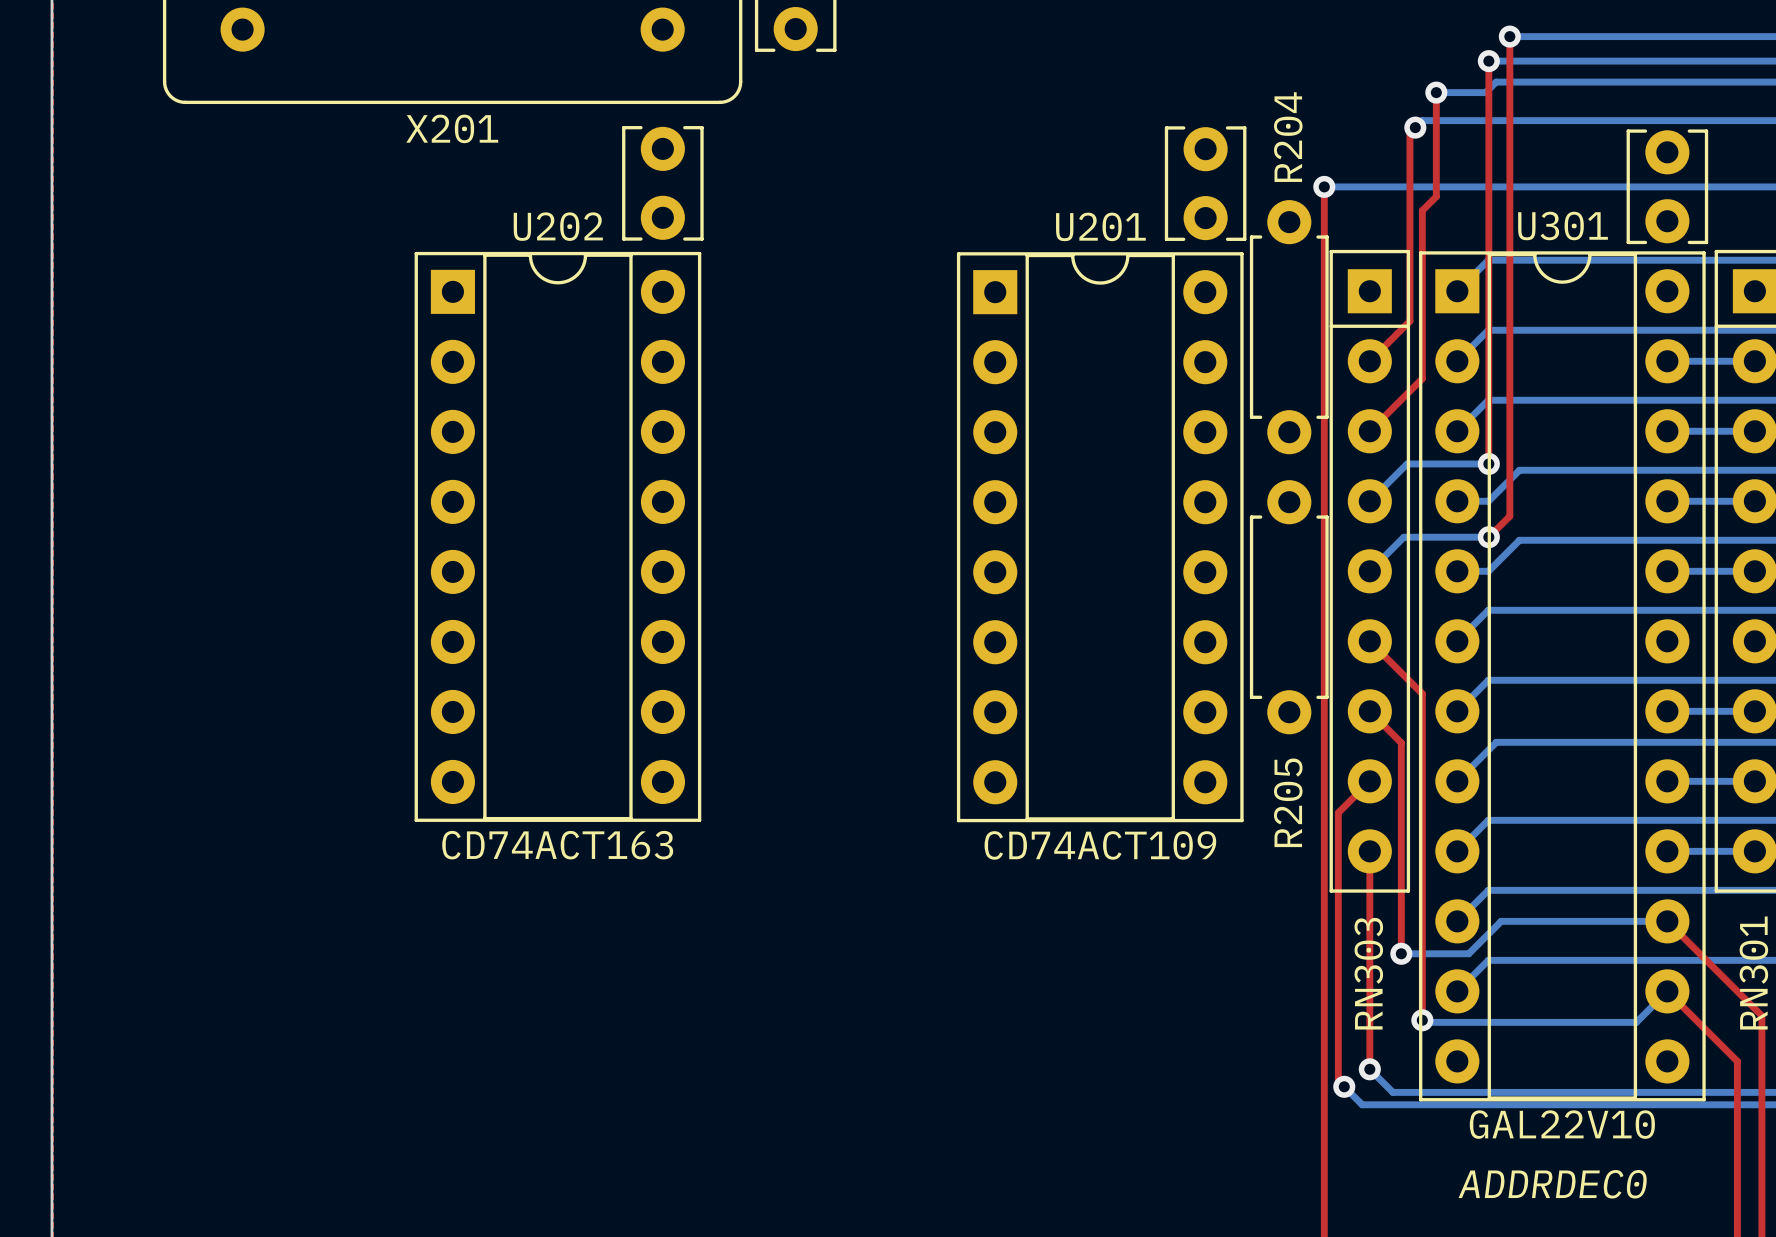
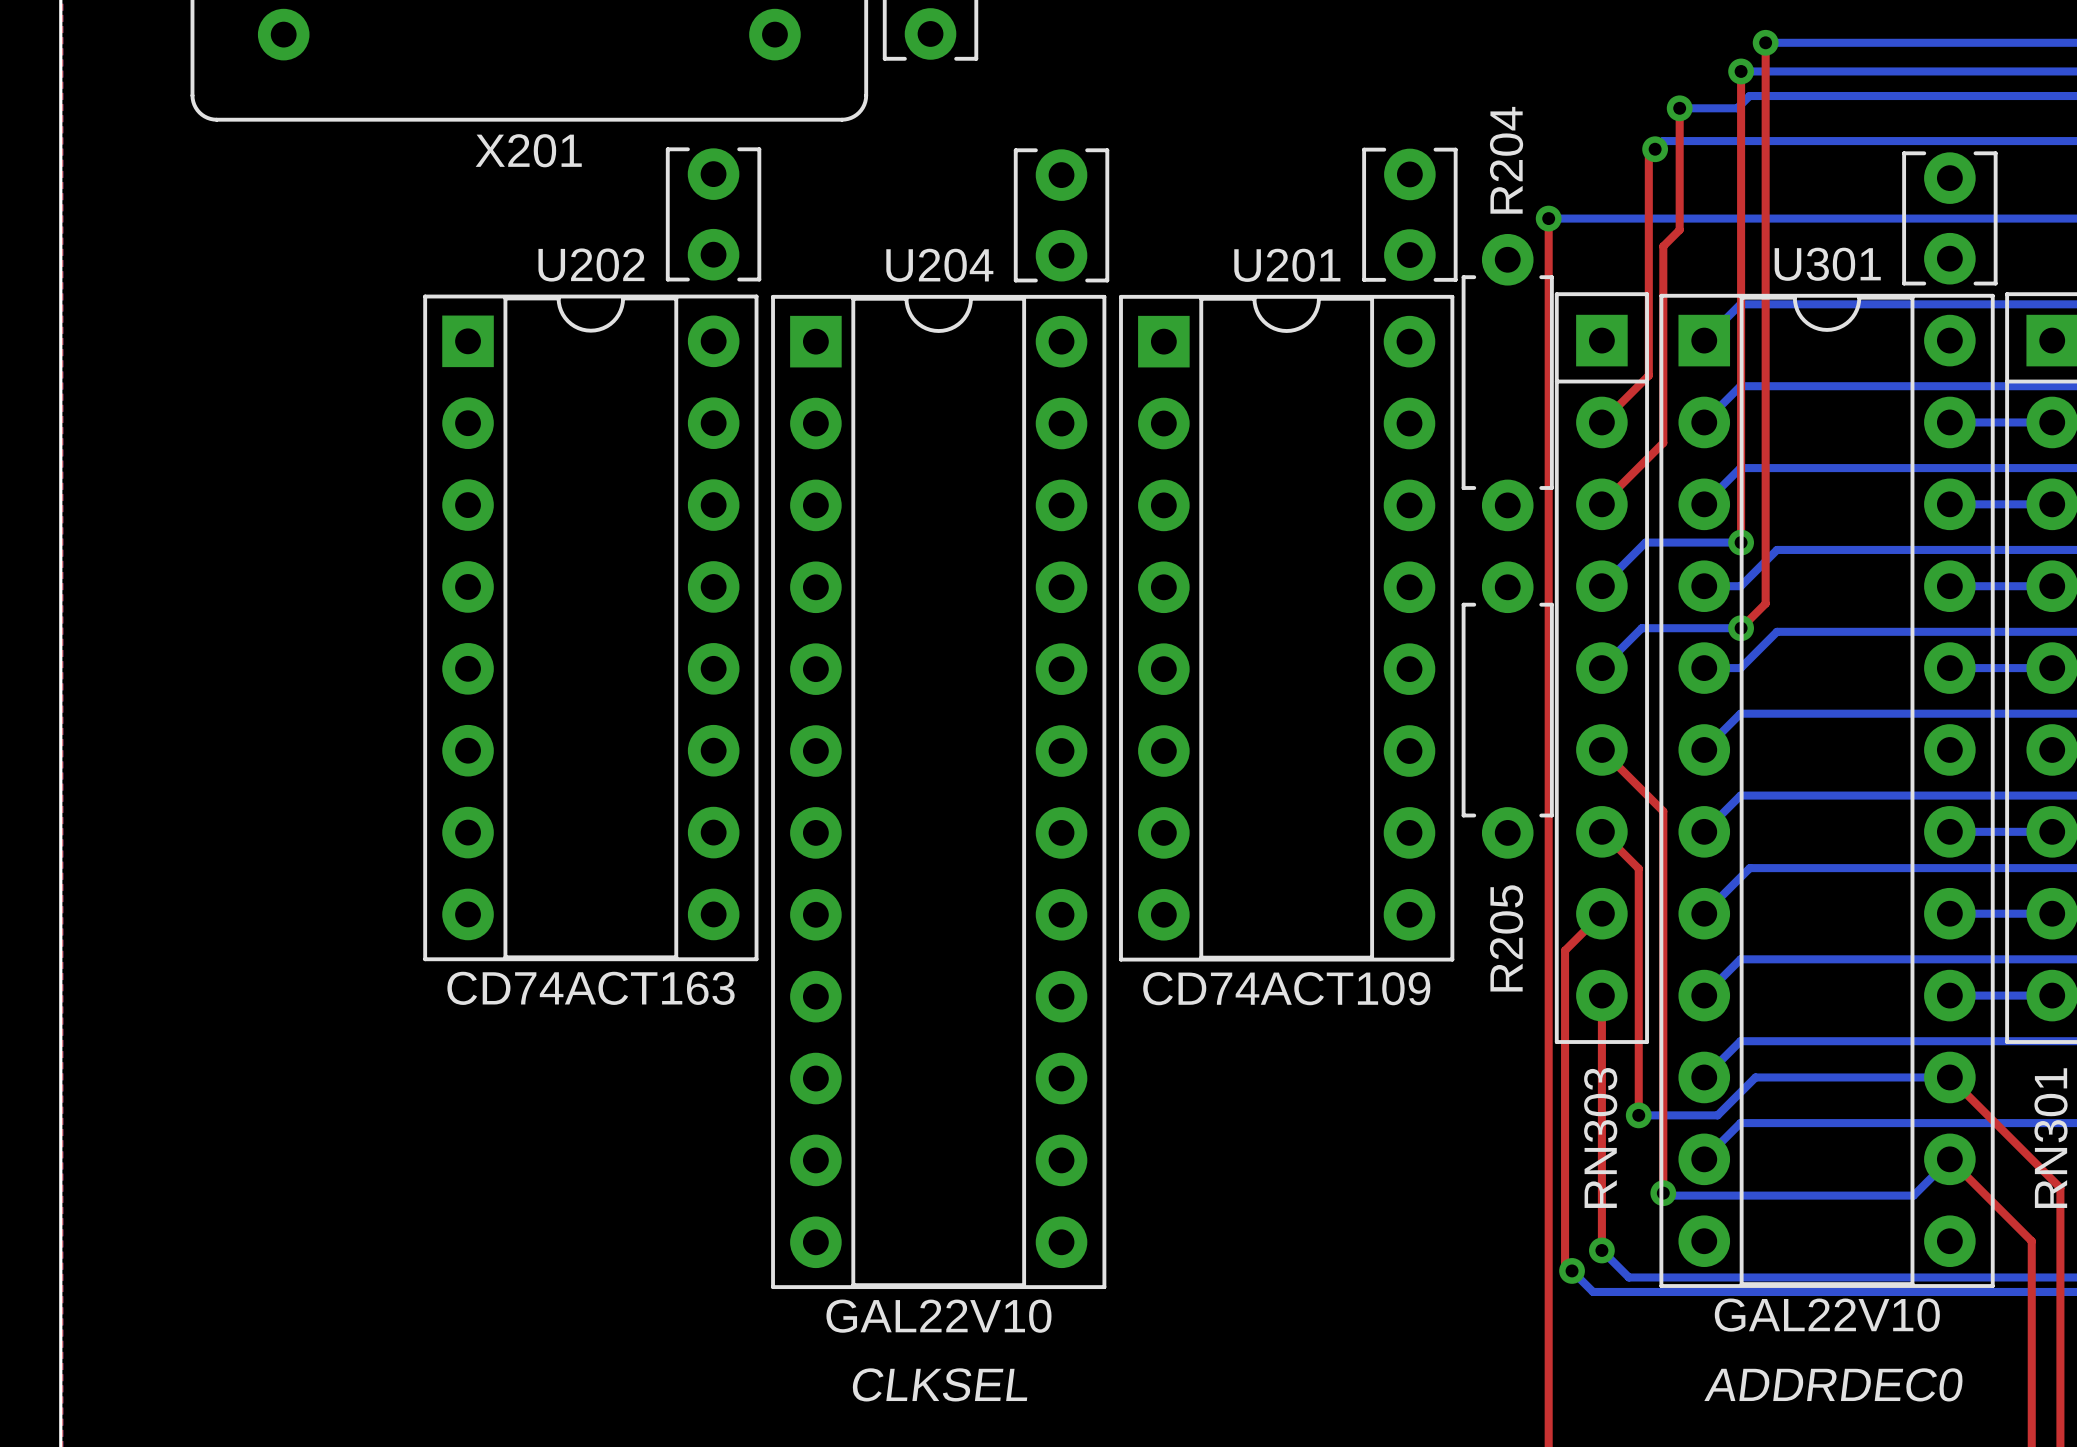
part position: (662, 183) -> (713, 214)
part: none -> (1061, 215)
U202 position: (557, 536) -> (590, 627)
U204: none -> GAL22V10 (938, 791)
text: none -> CLKSEL (939, 1384)

